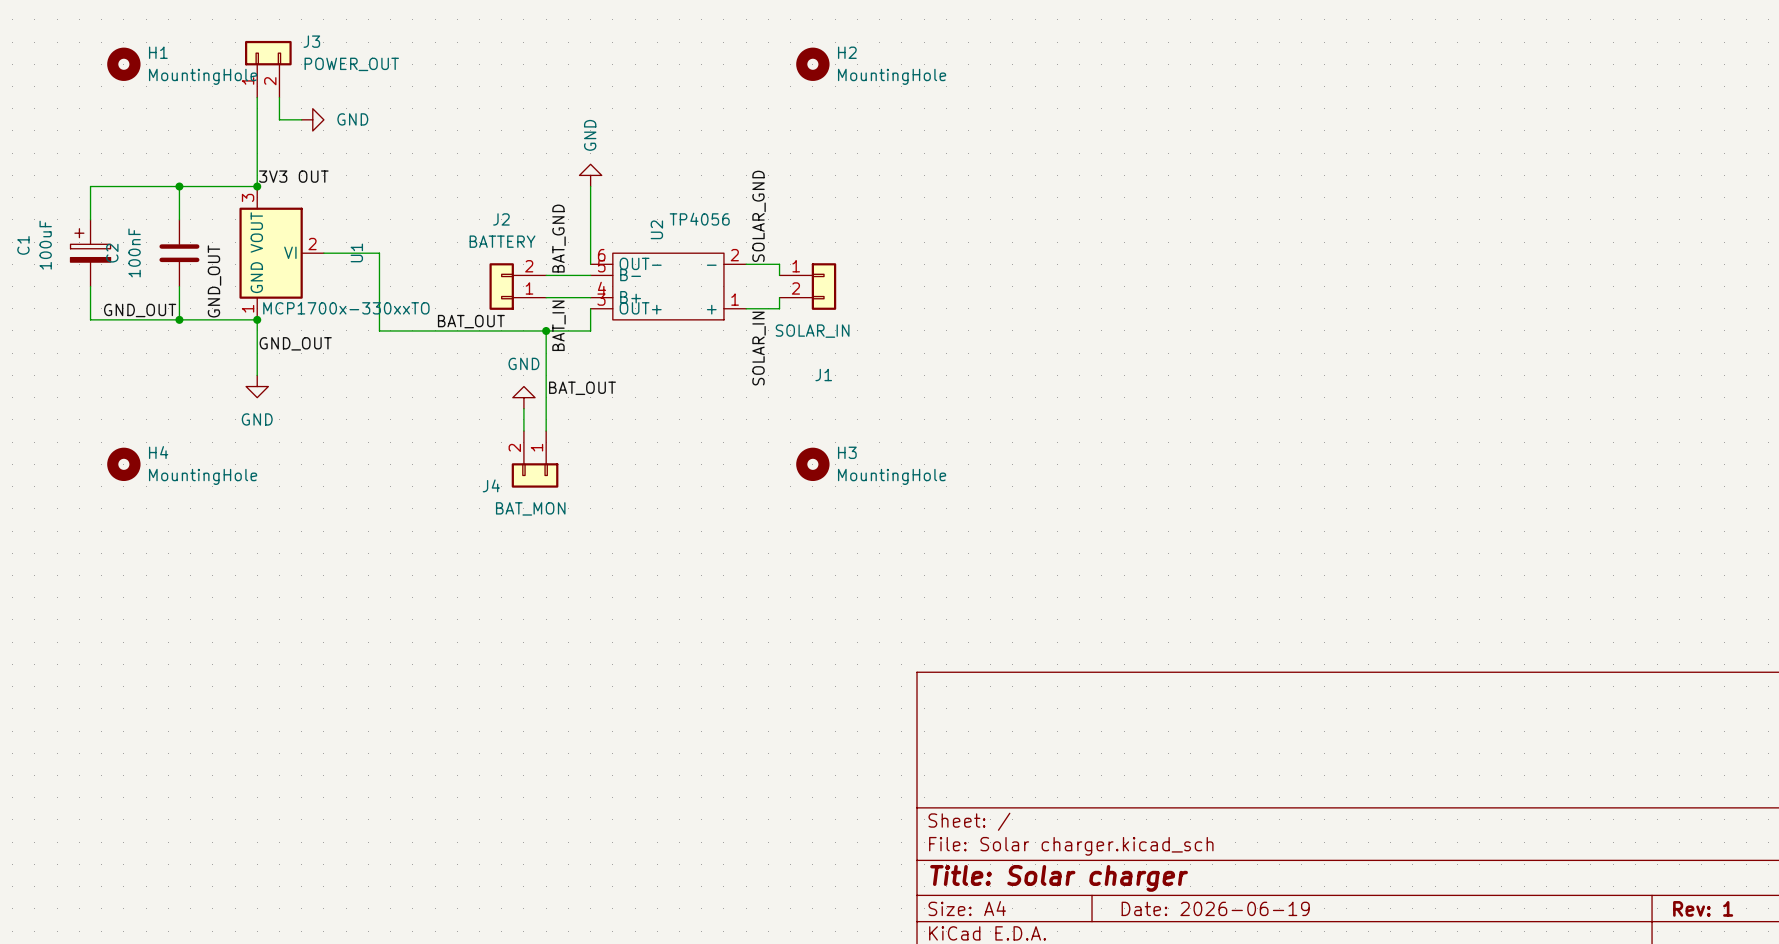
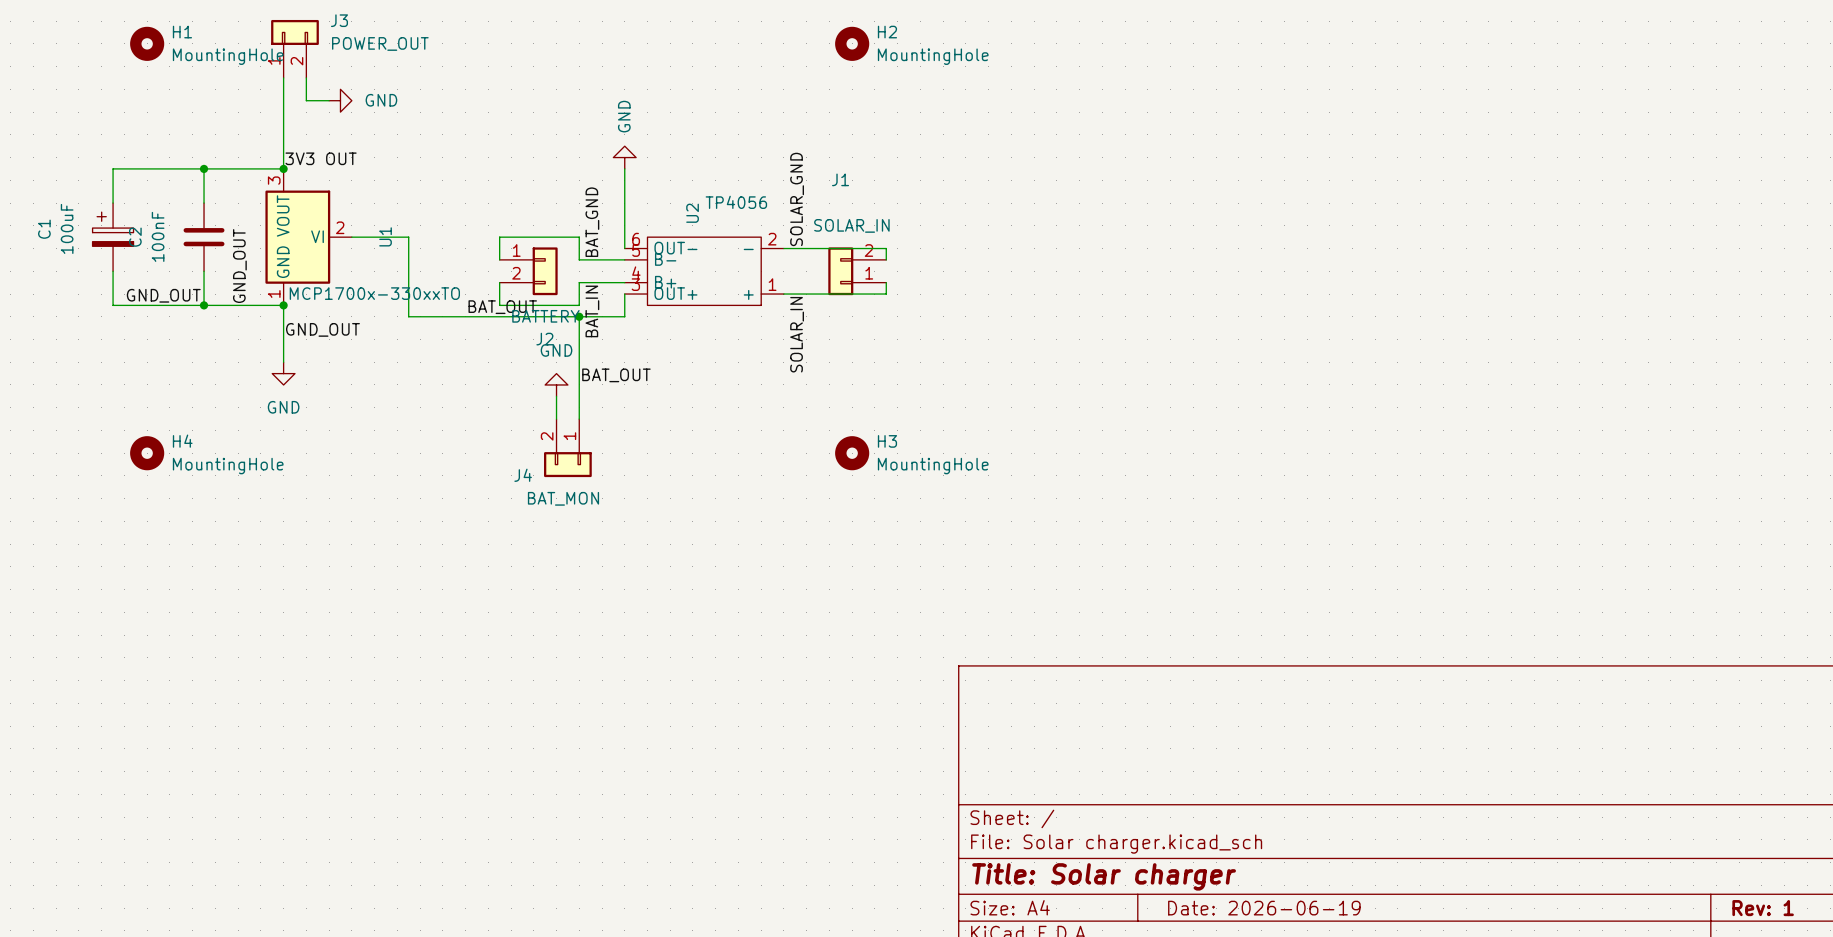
wire: (779, 264) (779, 275) -> (818, 248) (886, 248) (886, 259)
wire: none -> (499, 259) (499, 237) (579, 237) (579, 259)
J2 rotation: 0° (501, 286) -> 180° (545, 271)
J1 rotation: 0° (823, 286) -> 180° (840, 271)
wire: none -> (499, 282) (499, 305) (579, 305) (579, 282)
wire: (779, 297) (779, 308) -> (886, 282) (886, 294) (818, 294)

